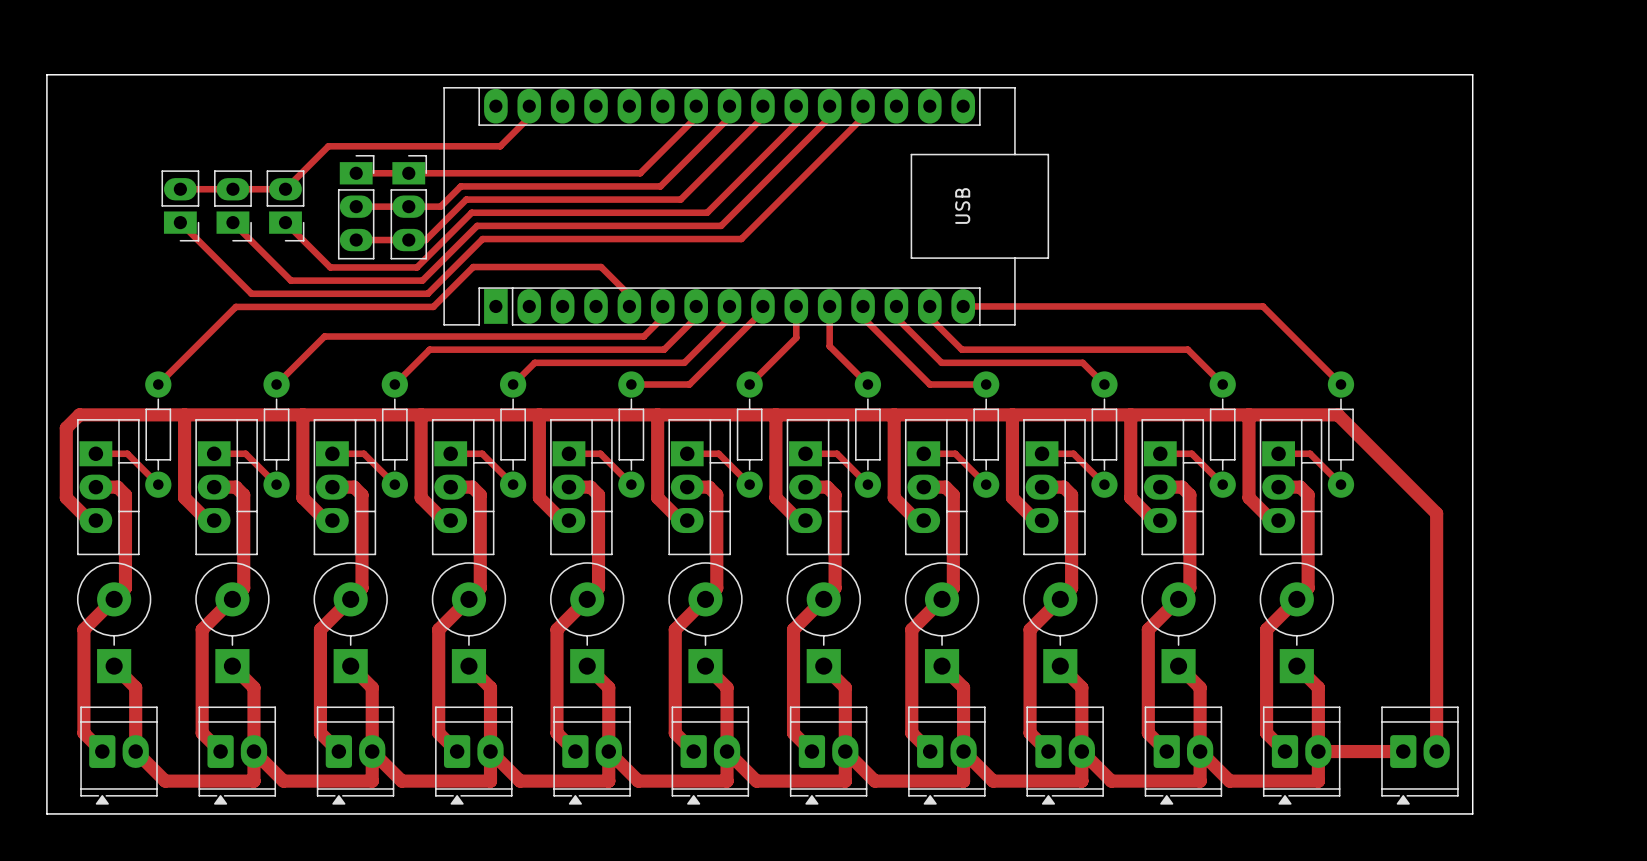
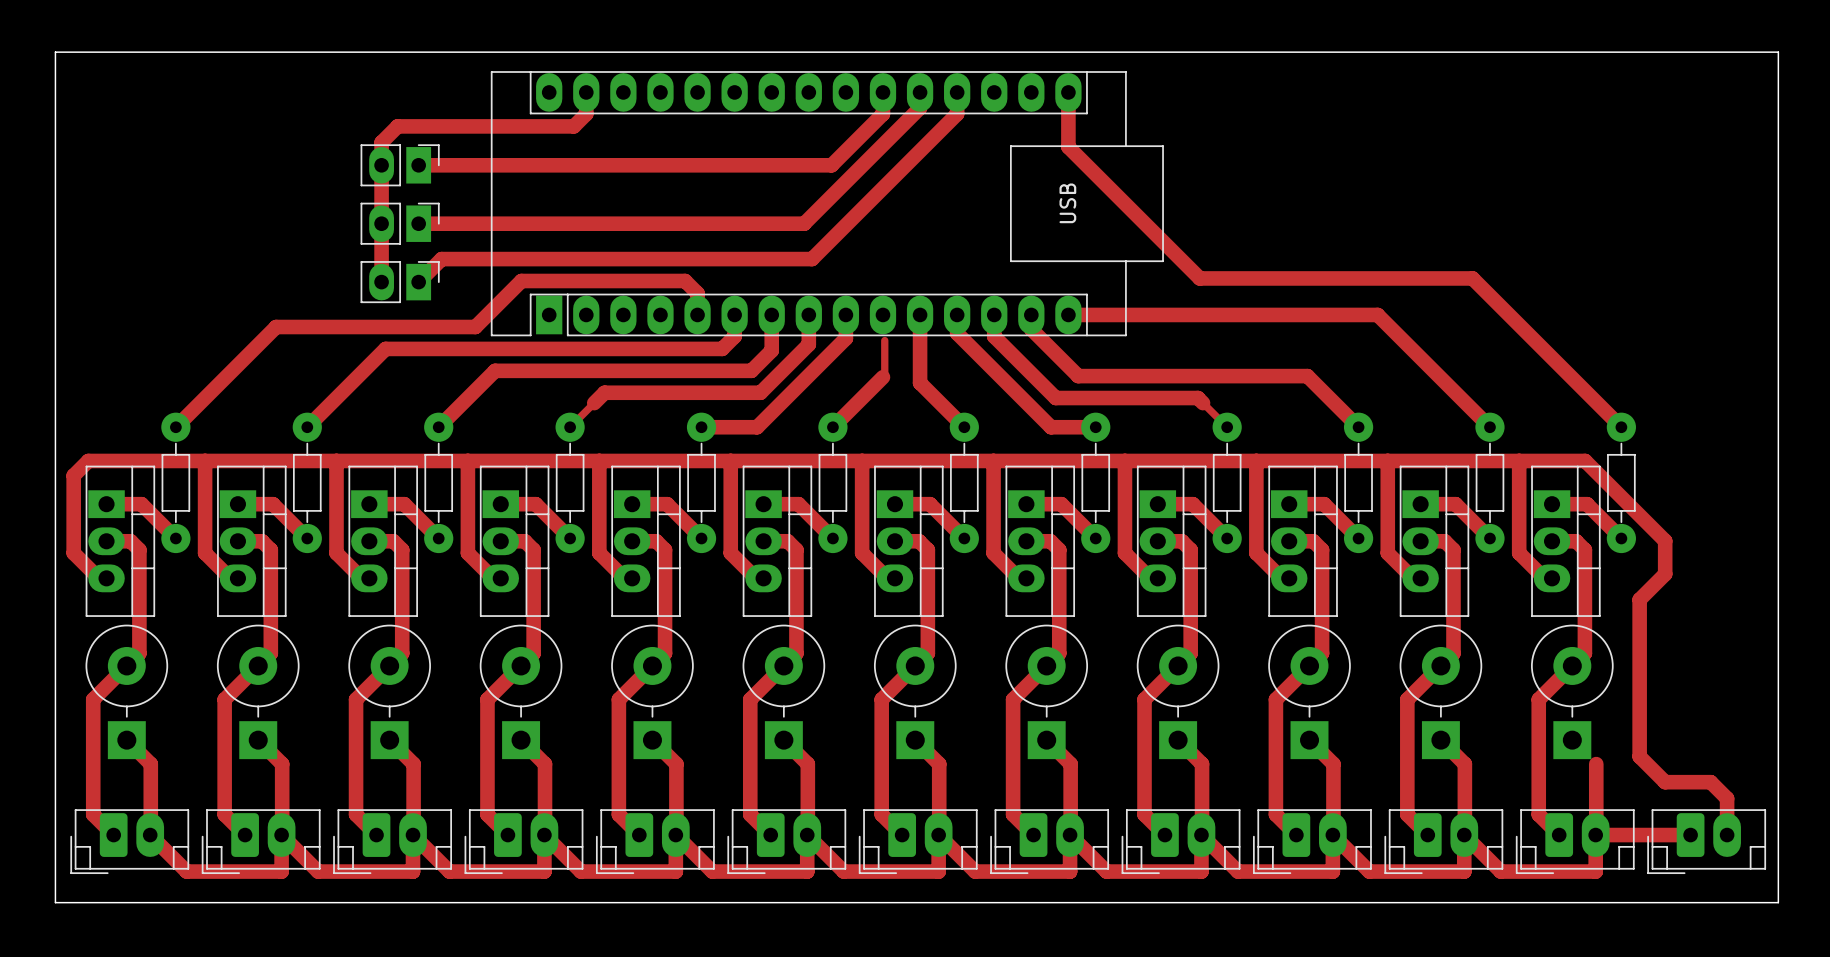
board edge: (46, 74) (1472, 74) (1472, 813) (46, 813) (46, 74) -> (55, 52) (55, 902) (1778, 902) (1778, 52) (55, 52)
track: none -> (586, 92) (586, 113) (573, 126) (397, 126) (381, 142) (381, 282)
track: none -> (882, 92) (882, 113) (831, 165) (418, 165)
track: none -> (920, 92) (920, 107) (804, 223) (418, 223)
track: none -> (957, 92) (957, 113) (812, 259) (441, 259) (418, 282)
track: none -> (1068, 92) (1068, 147) (1199, 278) (1472, 278) (1621, 427)
track: (529, 106) (529, 117) (500, 146) (328, 146) (285, 189) (180, 189) -> none
track: (696, 106) (696, 117) (640, 173) (356, 173) -> none
track: (729, 106) (729, 117) (660, 186) (460, 186) (440, 206) (356, 206) -> none
track: (762, 106) (762, 117) (680, 199) (466, 199) (425, 240) (356, 240) -> none
track: (796, 106) (796, 123) (707, 212) (471, 212) (417, 267) (330, 267) (285, 222) -> none
track: (829, 106) (829, 117) (721, 225) (477, 225) (422, 280) (290, 280) (232, 222) -> none
track: (863, 106) (863, 117) (741, 239) (482, 239) (427, 293) (251, 293) (180, 222) -> none
part: none -> (400, 165)
part footprint: [337, 155, 375, 260] -> [360, 202, 440, 245]
part: (180, 205) -> none
part: (232, 205) -> none
part: (285, 205) -> none
part position: (746, 206) -> (827, 203)
part: (408, 207) -> none
part: none -> (400, 282)
track width: thin (235, 306) (158, 384) -> thick (262, 341) (175, 427)
track: (629, 306) (629, 295) (601, 267) (473, 267) (433, 306) (235, 306) -> (697, 314) (697, 293) (685, 280) (521, 280) (475, 327) (276, 327) (262, 341)
track: (662, 306) (662, 317) (643, 336) (324, 336) -> (734, 314) (734, 336) (722, 348) (385, 348) (360, 373)
track: (696, 306) (696, 317) (664, 349) (429, 349) -> (771, 314) (771, 350) (751, 370) (495, 370) (477, 388)
track: (729, 306) (729, 317) (684, 362) (534, 362) -> (808, 314) (808, 344) (760, 392) (604, 392) (594, 403)
track: (762, 306) (762, 311) (689, 384) (681, 384) -> (845, 314) (845, 338) (757, 427)
track: (829, 306) (829, 346) -> (920, 314) (920, 382) (921, 384)
track: (863, 306) (863, 317) (929, 384) (945, 384) -> (957, 314) (957, 333) (1051, 427)
track: (896, 306) (896, 317) (941, 362) (1082, 362) -> (994, 314) (994, 336) (1055, 398) (1197, 398) (1203, 403)
track: (929, 306) (929, 317) (961, 349) (1187, 349) -> (1031, 314) (1031, 329) (1078, 376) (1307, 376) (1319, 388)
track: (963, 306) (1262, 306) -> (1068, 314) (1377, 314) (1403, 340)
track width: thin (1262, 306) (1340, 384) -> thick (1403, 340) (1489, 427)
track width: thin (324, 336) (276, 384) -> thick (360, 373) (307, 427)
track width: thin (794, 339) (749, 384) -> thick (882, 377) (832, 427)
track width: thin (829, 346) (867, 384) -> thick (921, 384) (964, 427)
track width: thin (429, 349) (394, 384) -> thick (477, 388) (438, 427)
track width: thin (1187, 349) (1222, 384) -> thick (1319, 388) (1358, 427)
track width: thin (631, 384) (681, 384) -> thick (701, 427) (757, 427)
track width: thin (945, 384) (986, 384) -> thick (1051, 427) (1095, 427)
track: (1338, 414) (1436, 513) (1436, 687) -> (1486, 460) (1585, 460) (1665, 540) (1665, 574) (1639, 599) (1639, 756) (1665, 782) (1710, 782) (1727, 798) (1727, 835)
track: none -> (1519, 460) (1519, 553) (1544, 578) (1552, 578)
part: none -> (1621, 482)
track width: thin (95, 453) (127, 453) (158, 484) -> thick (106, 504) (141, 504) (175, 538)
track width: thin (214, 453) (245, 453) (276, 484) -> thick (237, 504) (272, 504) (307, 538)
track width: thin (332, 453) (363, 453) (394, 484) -> thick (369, 504) (404, 504) (438, 538)
track width: thin (450, 453) (482, 453) (513, 484) -> thick (500, 504) (535, 504) (570, 538)
track width: thin (568, 453) (600, 453) (631, 484) -> thick (632, 504) (667, 504) (701, 538)
track width: thin (687, 453) (718, 453) (749, 484) -> thick (763, 504) (798, 504) (832, 538)
track width: thin (805, 453) (837, 453) (867, 484) -> thick (894, 504) (930, 504) (964, 538)
track width: thin (923, 453) (955, 453) (986, 484) -> thick (1026, 504) (1061, 504) (1095, 538)
track width: thin (1042, 453) (1073, 453) (1104, 484) -> thick (1157, 504) (1192, 504) (1227, 538)
track width: thin (1160, 453) (1191, 453) (1222, 484) -> thick (1289, 504) (1324, 504) (1358, 538)
track width: thin (1278, 453) (1310, 453) (1340, 484) -> thick (1420, 504) (1455, 504) (1489, 538)
track: none -> (1552, 504) (1587, 504) (1621, 538)
part: none -> (1565, 541)
part: none -> (1572, 691)
part footprint: [80, 706, 158, 805] -> [70, 809, 190, 875]
part footprint: [198, 706, 277, 805] -> [201, 809, 321, 875]
part footprint: [316, 706, 395, 805] -> [333, 809, 452, 875]
part footprint: [435, 706, 513, 805] -> [464, 809, 584, 875]
part footprint: [553, 706, 631, 805] -> [595, 809, 715, 875]
part footprint: [671, 706, 750, 805] -> [727, 809, 847, 875]
part footprint: [789, 706, 868, 805] -> [858, 809, 978, 875]
part footprint: [908, 706, 986, 805] -> [990, 809, 1110, 875]
part footprint: [1026, 706, 1104, 805] -> [1121, 809, 1241, 875]
part footprint: [1144, 706, 1223, 805] -> [1253, 809, 1372, 875]
part footprint: [1262, 706, 1341, 805] -> [1384, 809, 1504, 875]
part footprint: [1381, 706, 1459, 805] -> [1515, 809, 1635, 875]
track: (135, 751) (165, 781) (253, 781) (253, 751) (283, 781) (372, 781) (372, 751) (401, 781) (490, 781) (490, 751) (520, 781) (608, 781) (608, 751) (638, 781) (727, 781) (727, 751) (756, 781) (845, 781) (845, 751) (874, 781) (963, 781) (963, 751) (993, 781) (1081, 781) (1081, 751) (1111, 781) (1200, 781) (1200, 751) (1229, 781) (1318, 781) (1318, 751) (1403, 751) -> (1552, 541) (1576, 541) (1584, 549) (1584, 653) (1538, 699) (1538, 814) (1559, 835)
track: none -> (150, 835) (186, 871) (281, 871) (281, 835) (318, 871) (413, 871) (413, 835) (449, 871) (544, 871) (544, 835) (580, 871) (675, 871) (675, 835) (712, 871) (807, 871) (807, 835) (843, 871) (938, 871) (938, 835) (975, 871) (1070, 871) (1070, 835) (1106, 871) (1201, 871) (1201, 835) (1237, 871) (1332, 871) (1332, 835) (1369, 871) (1464, 871) (1464, 835) (1500, 871) (1595, 871) (1595, 835) (1690, 835)
part: none -> (1706, 841)

